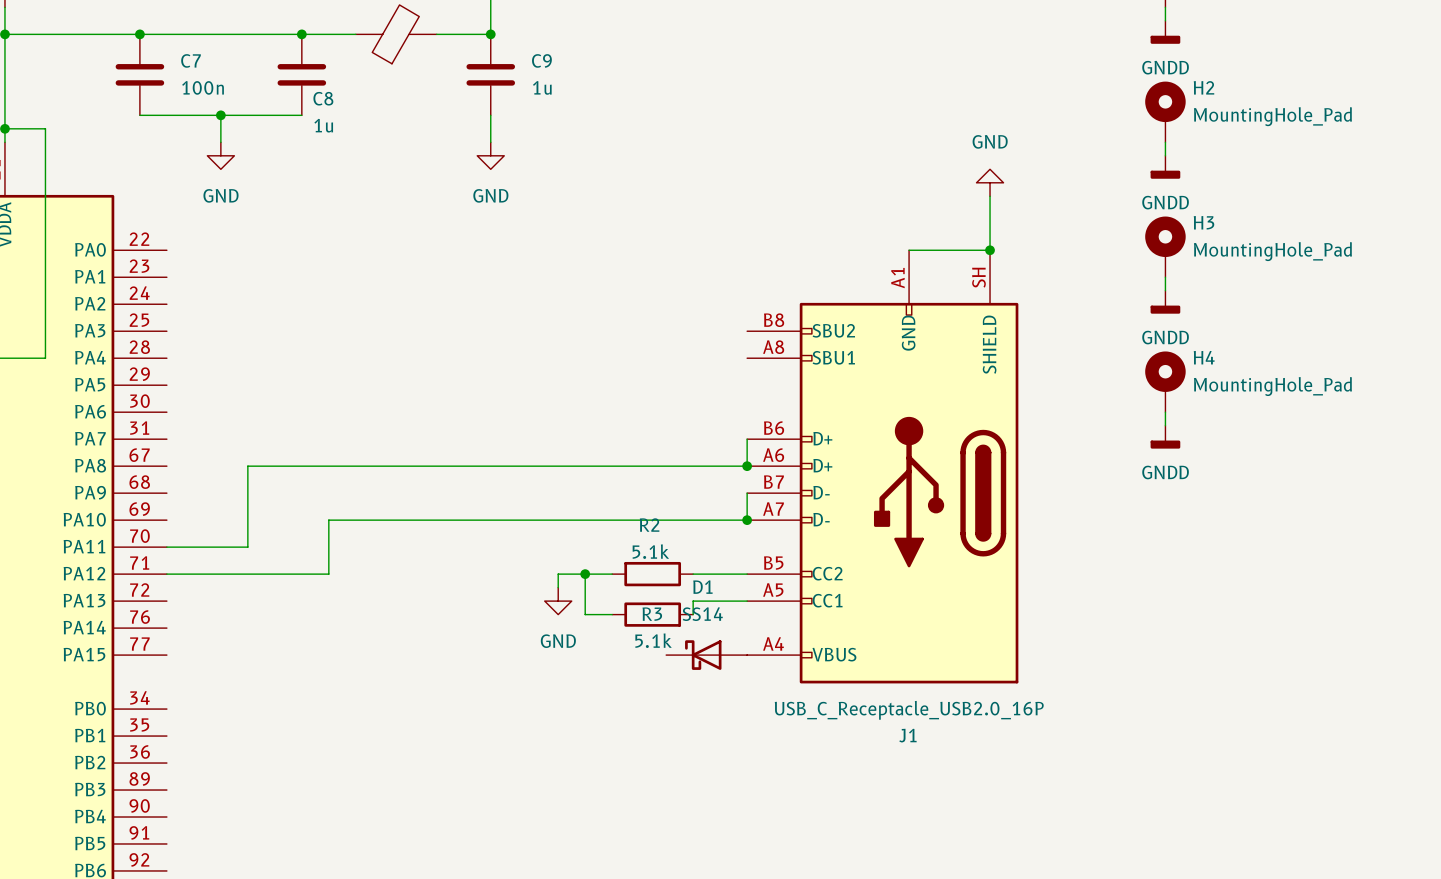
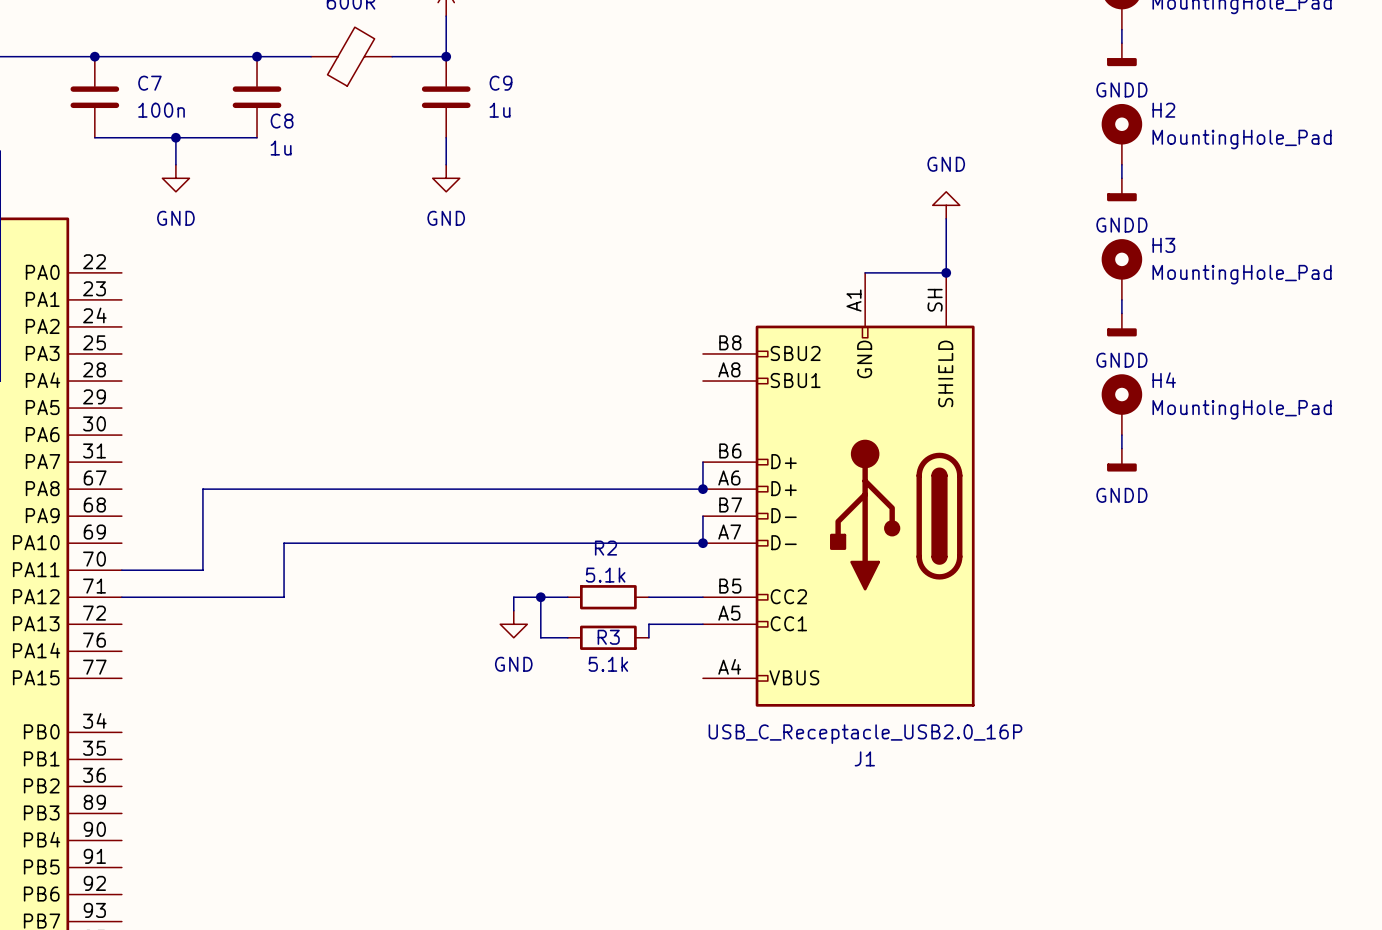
D1: SS14 (706, 655) -> none

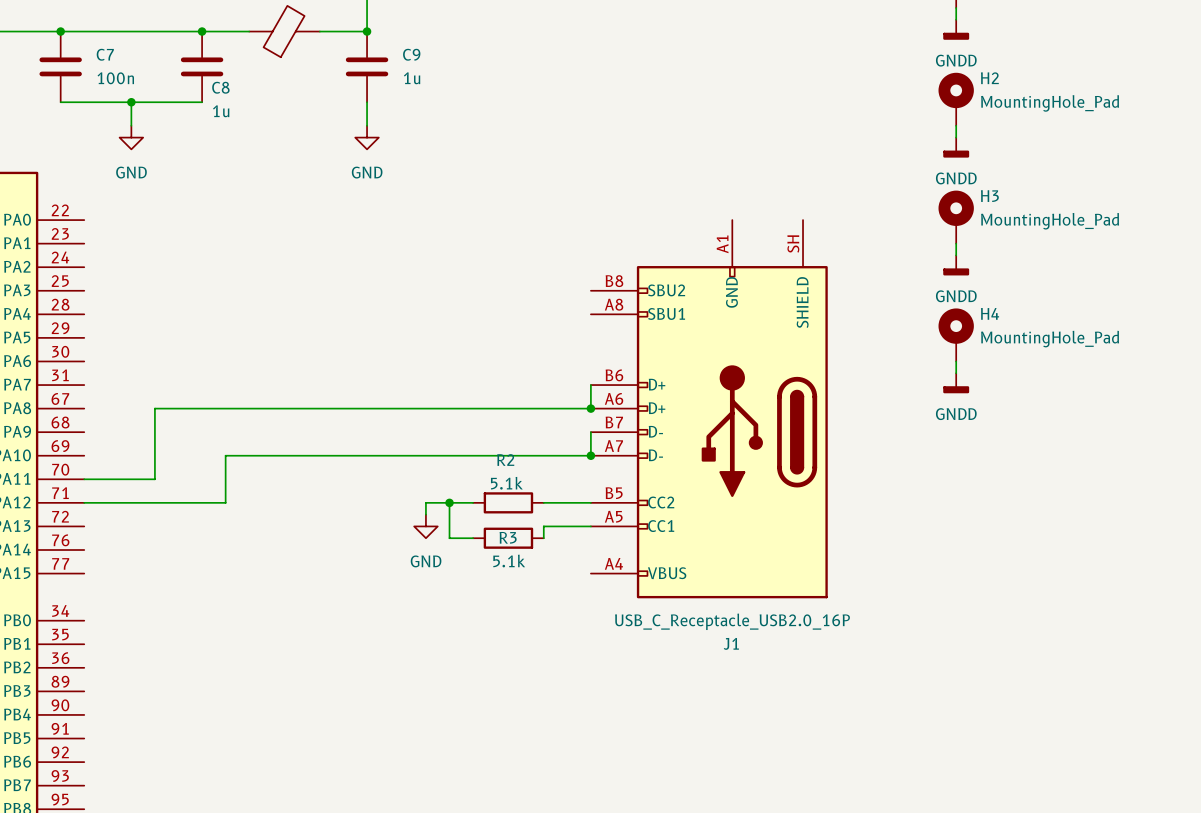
power symbol: GND (946, 205) -> none
wire: (946, 218) (946, 272) (865, 272) -> none
junction: (946, 272) -> none

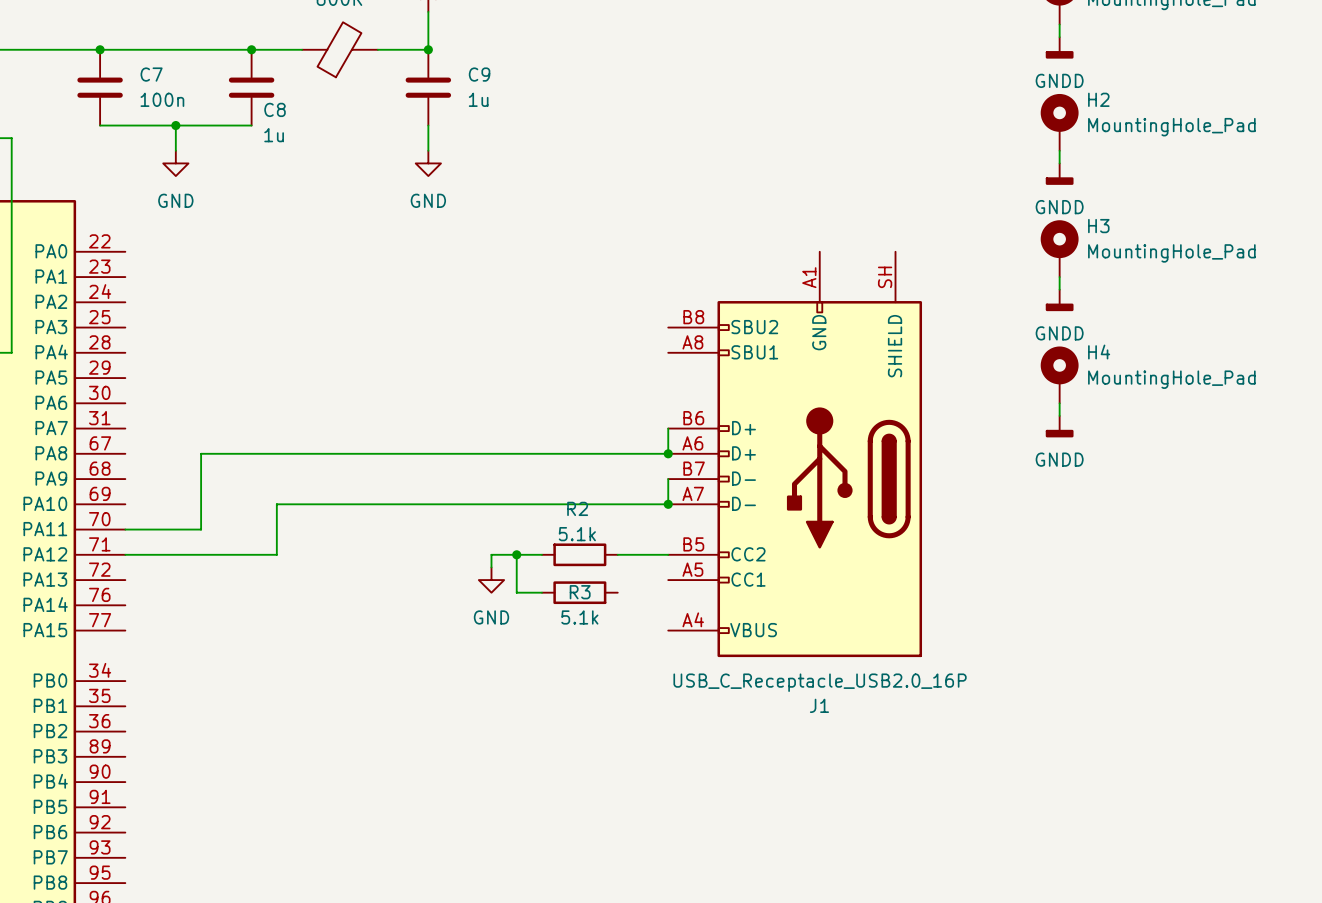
wire: (590, 526) (543, 526) (543, 538) -> none

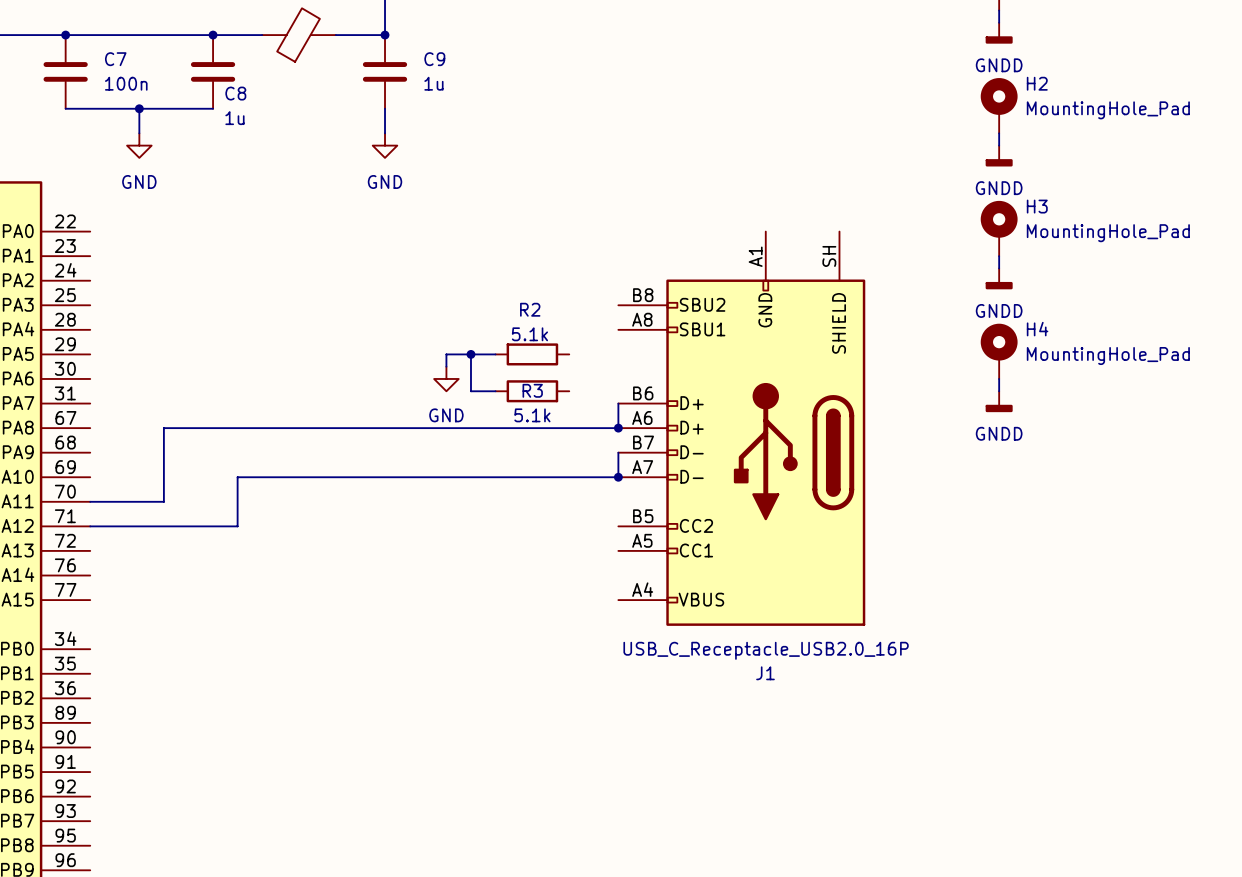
junction: none -> (470, 354)
wire: (516, 554) (516, 592) (541, 592) -> (470, 354) (470, 391) (495, 391)
junction: (516, 554) -> none
wire: (541, 554) (491, 554) (491, 567) -> (495, 354) (446, 354) (446, 366)
R2 position: (579, 554) -> (532, 354)
wire: (617, 554) (668, 554) -> none
power symbol position: GND (491, 580) -> GND (446, 378)
R3 position: (579, 592) -> (532, 391)

